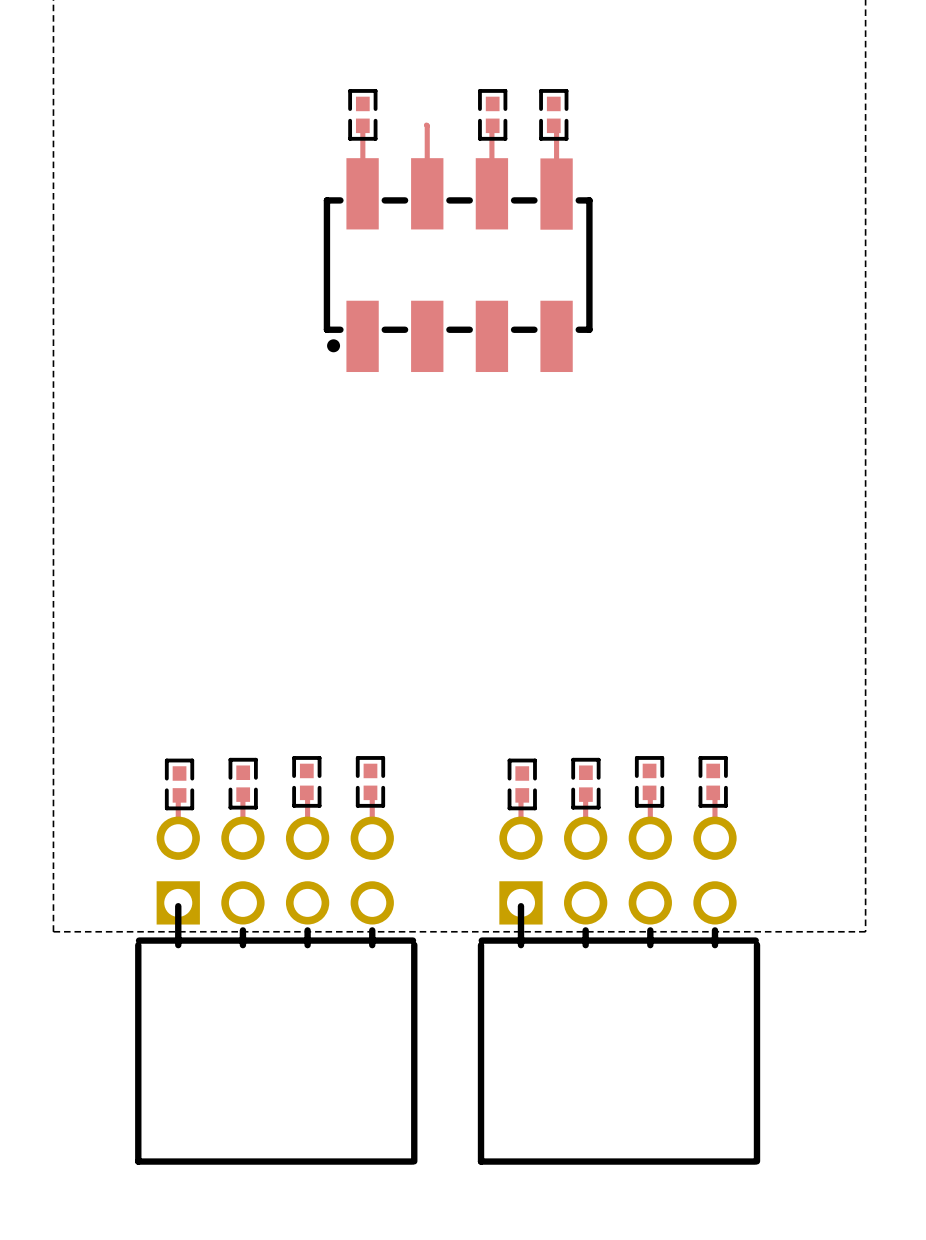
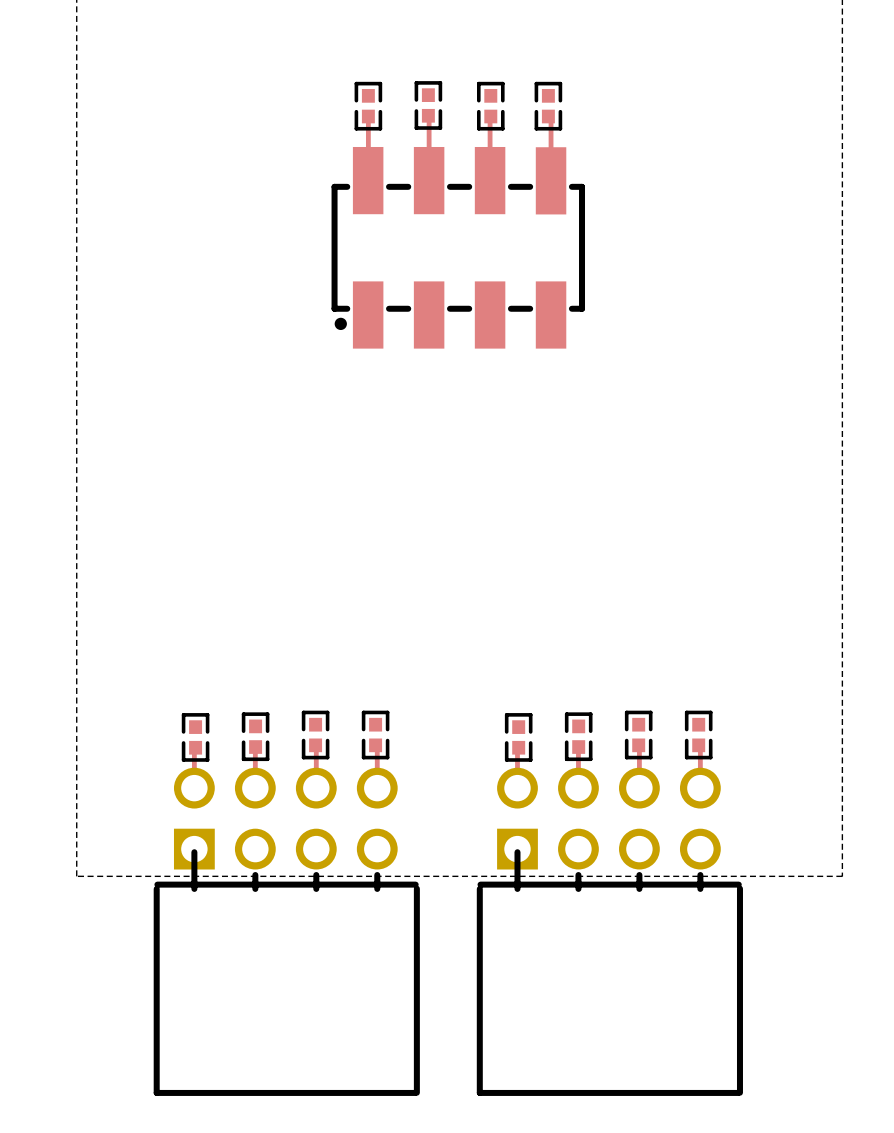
part: none -> (428, 105)

